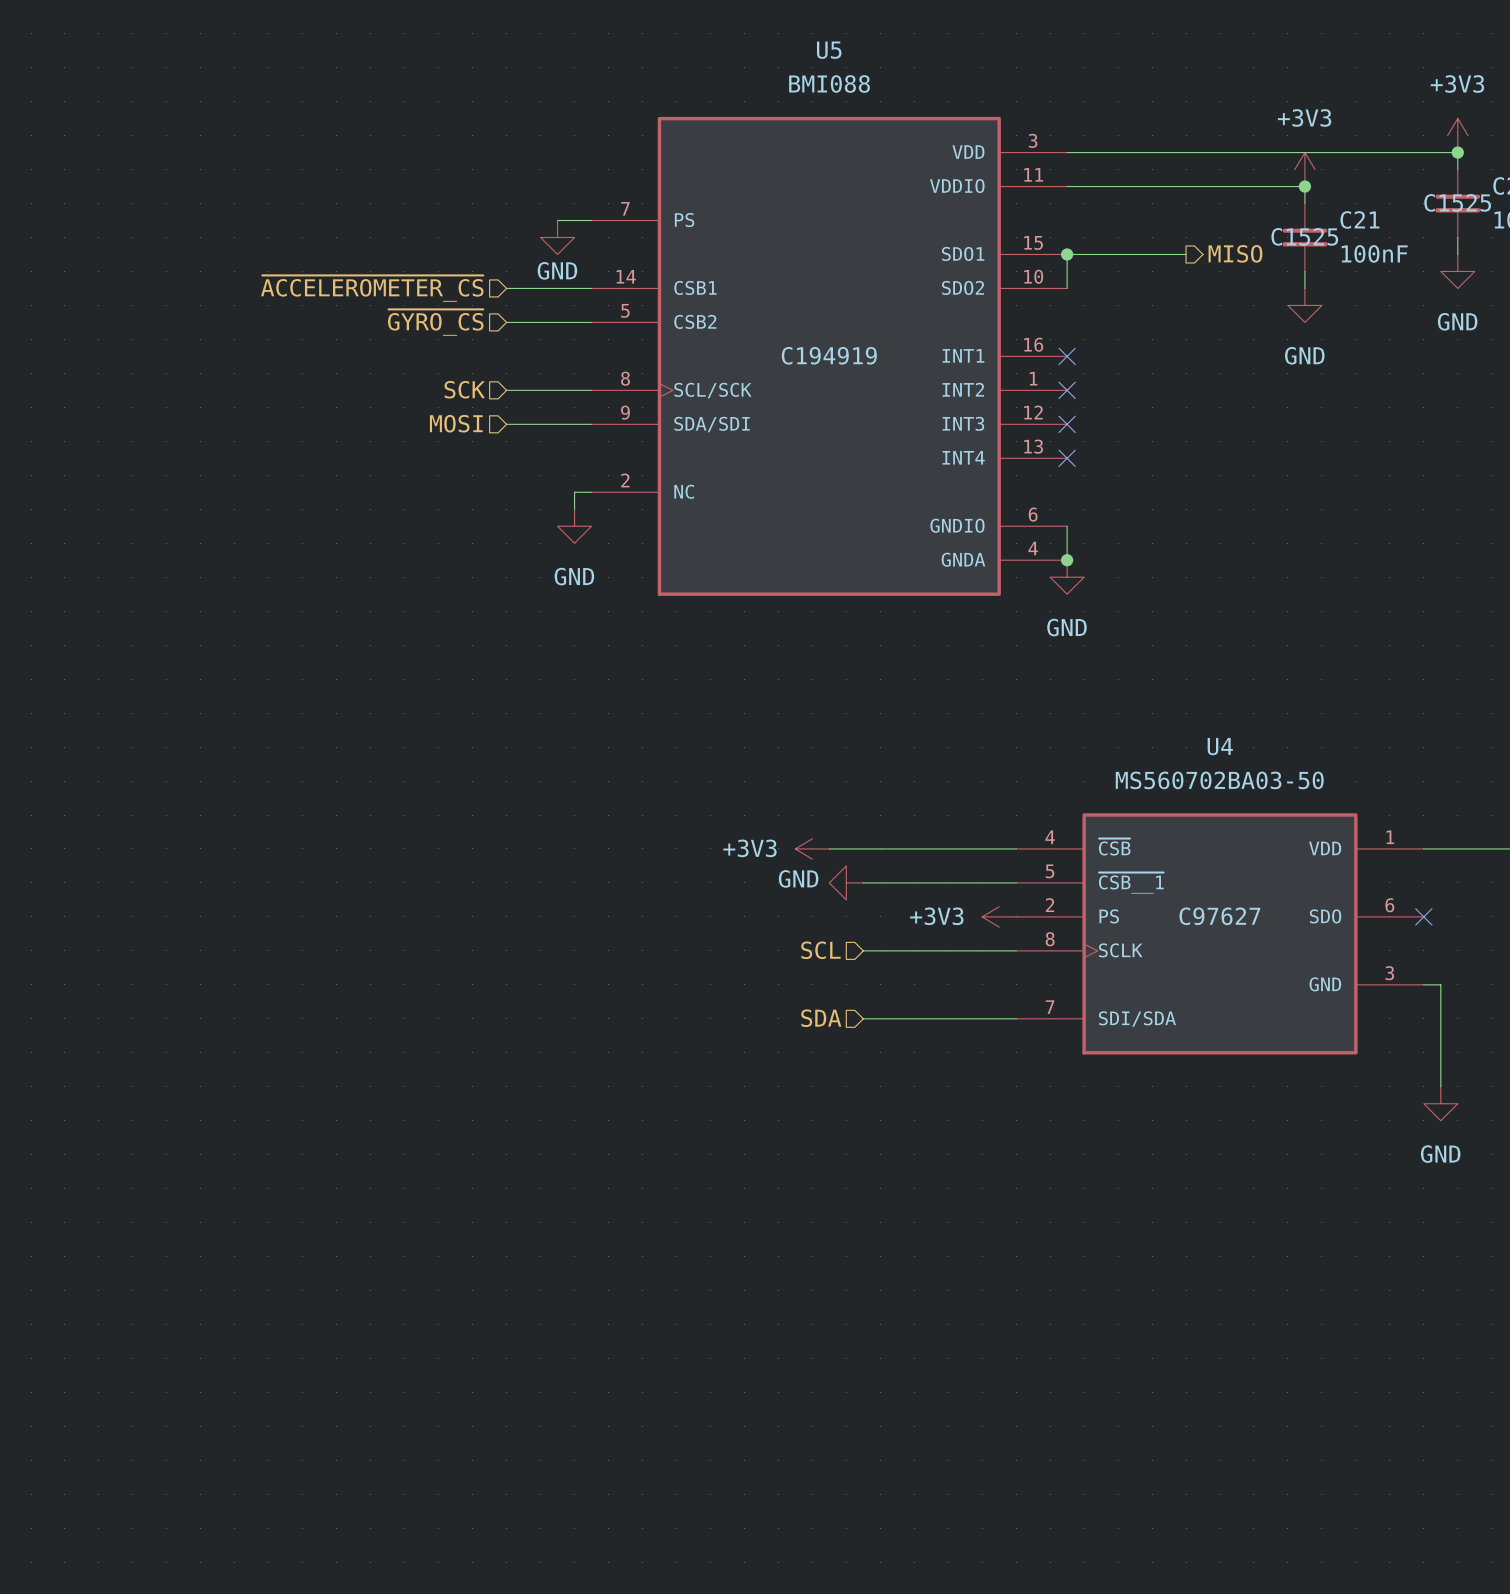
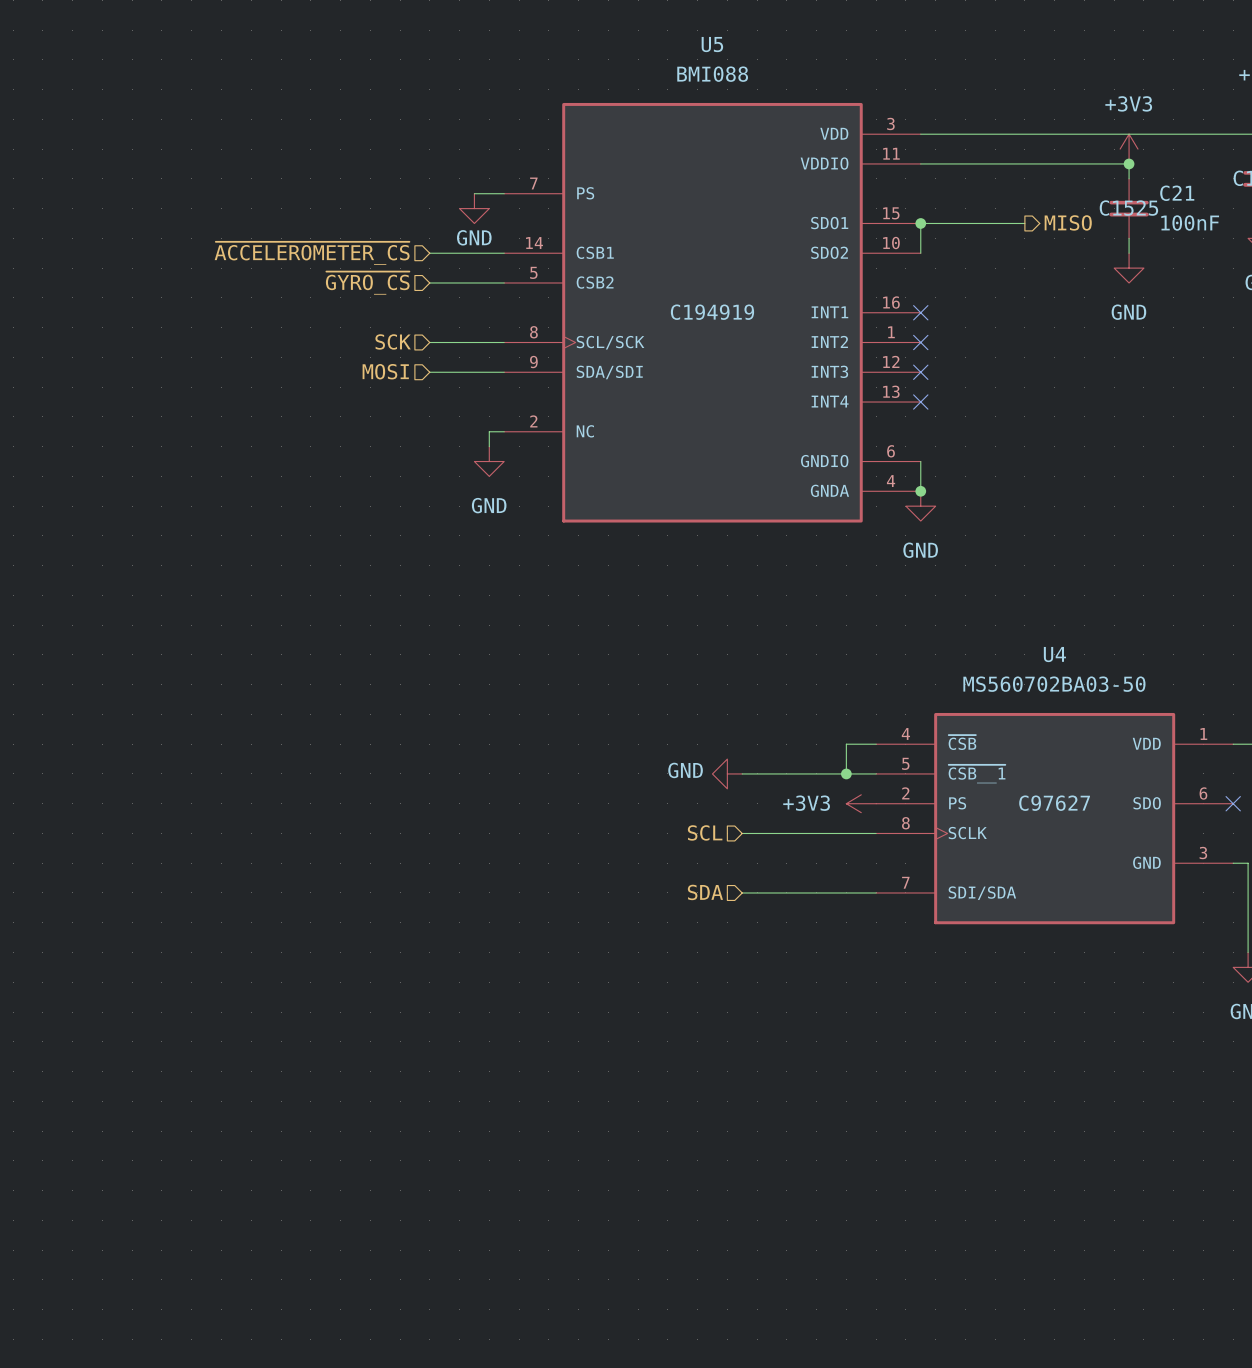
power symbol: +3V3 (812, 848) -> none
wire: (829, 848) (982, 848) -> (846, 773) (846, 744)
junction: none -> (846, 773)

